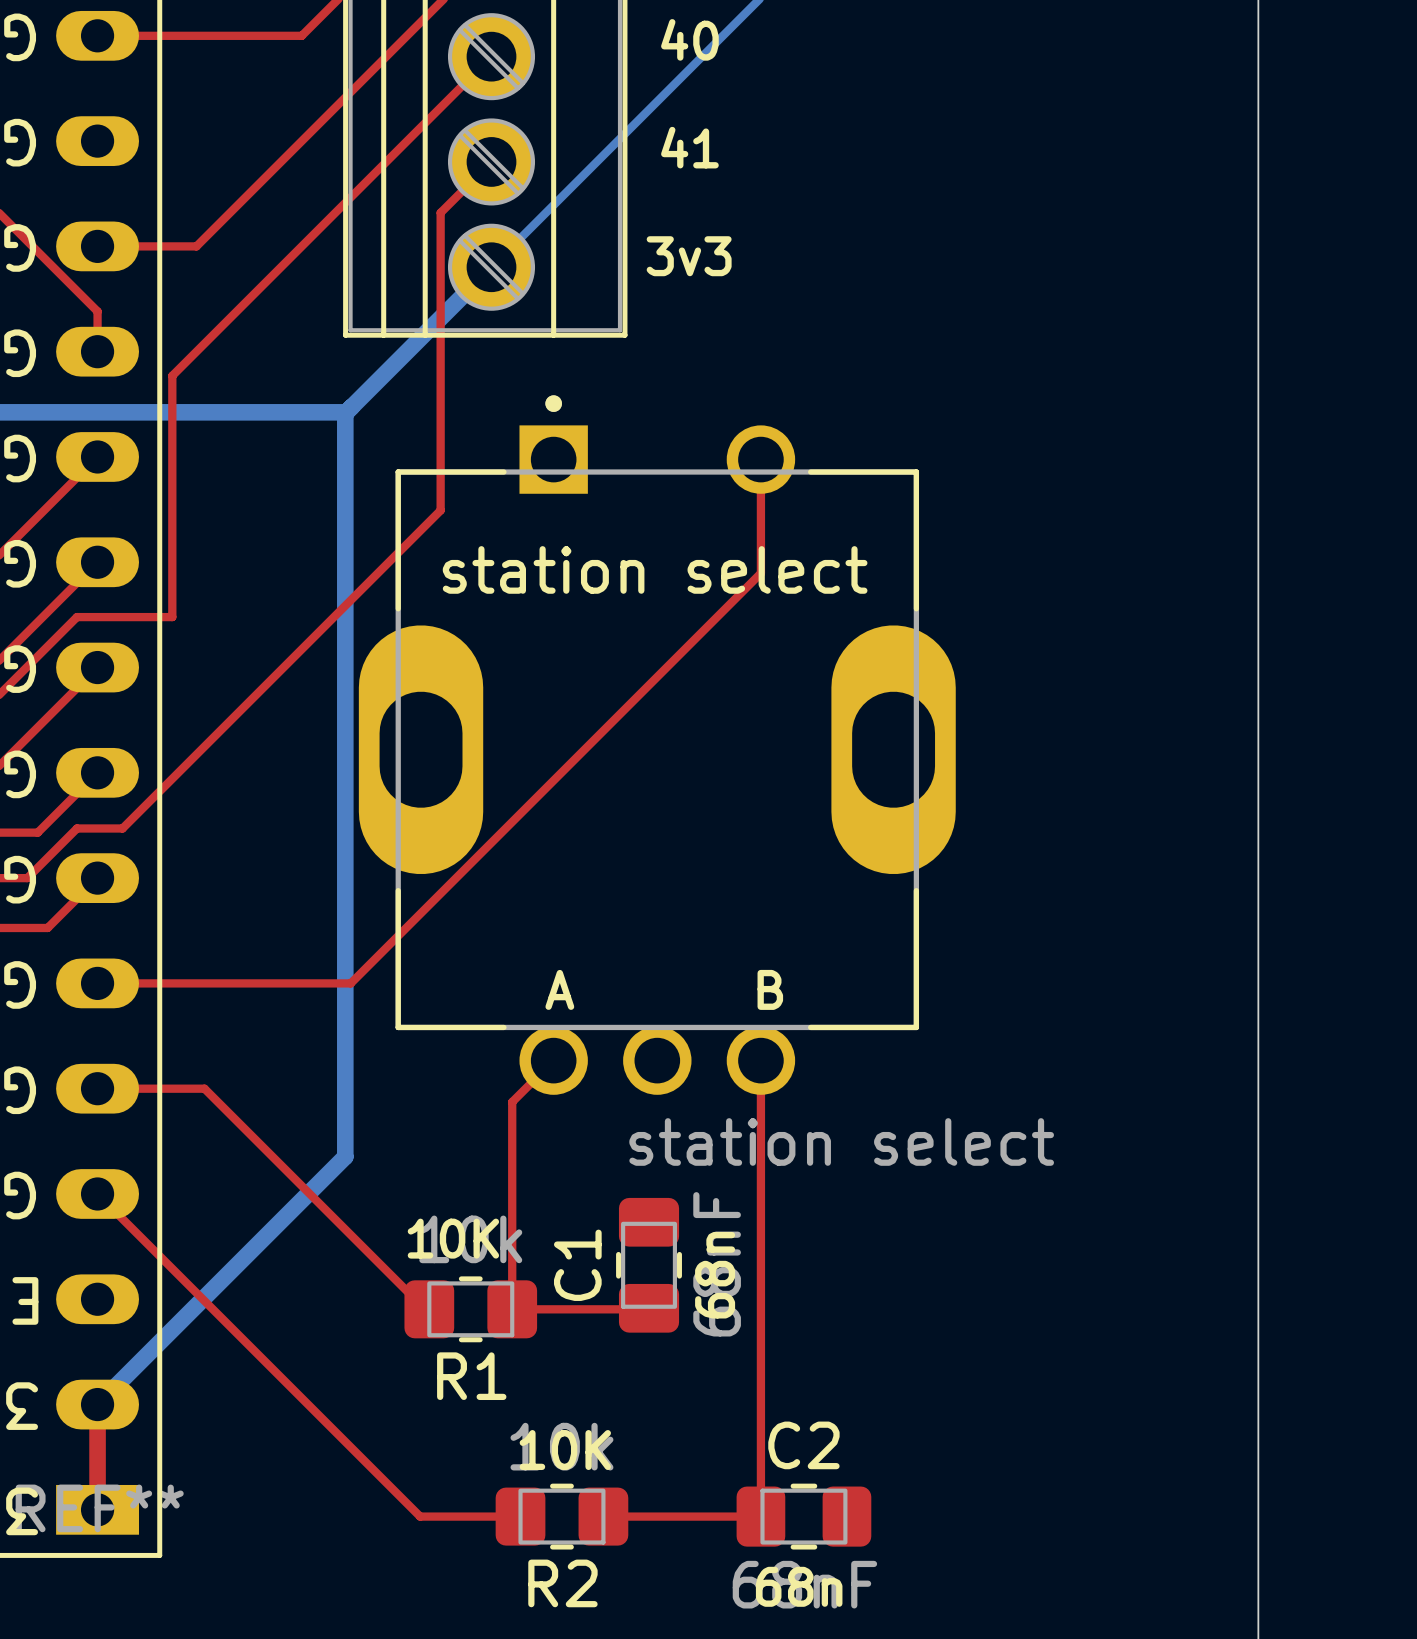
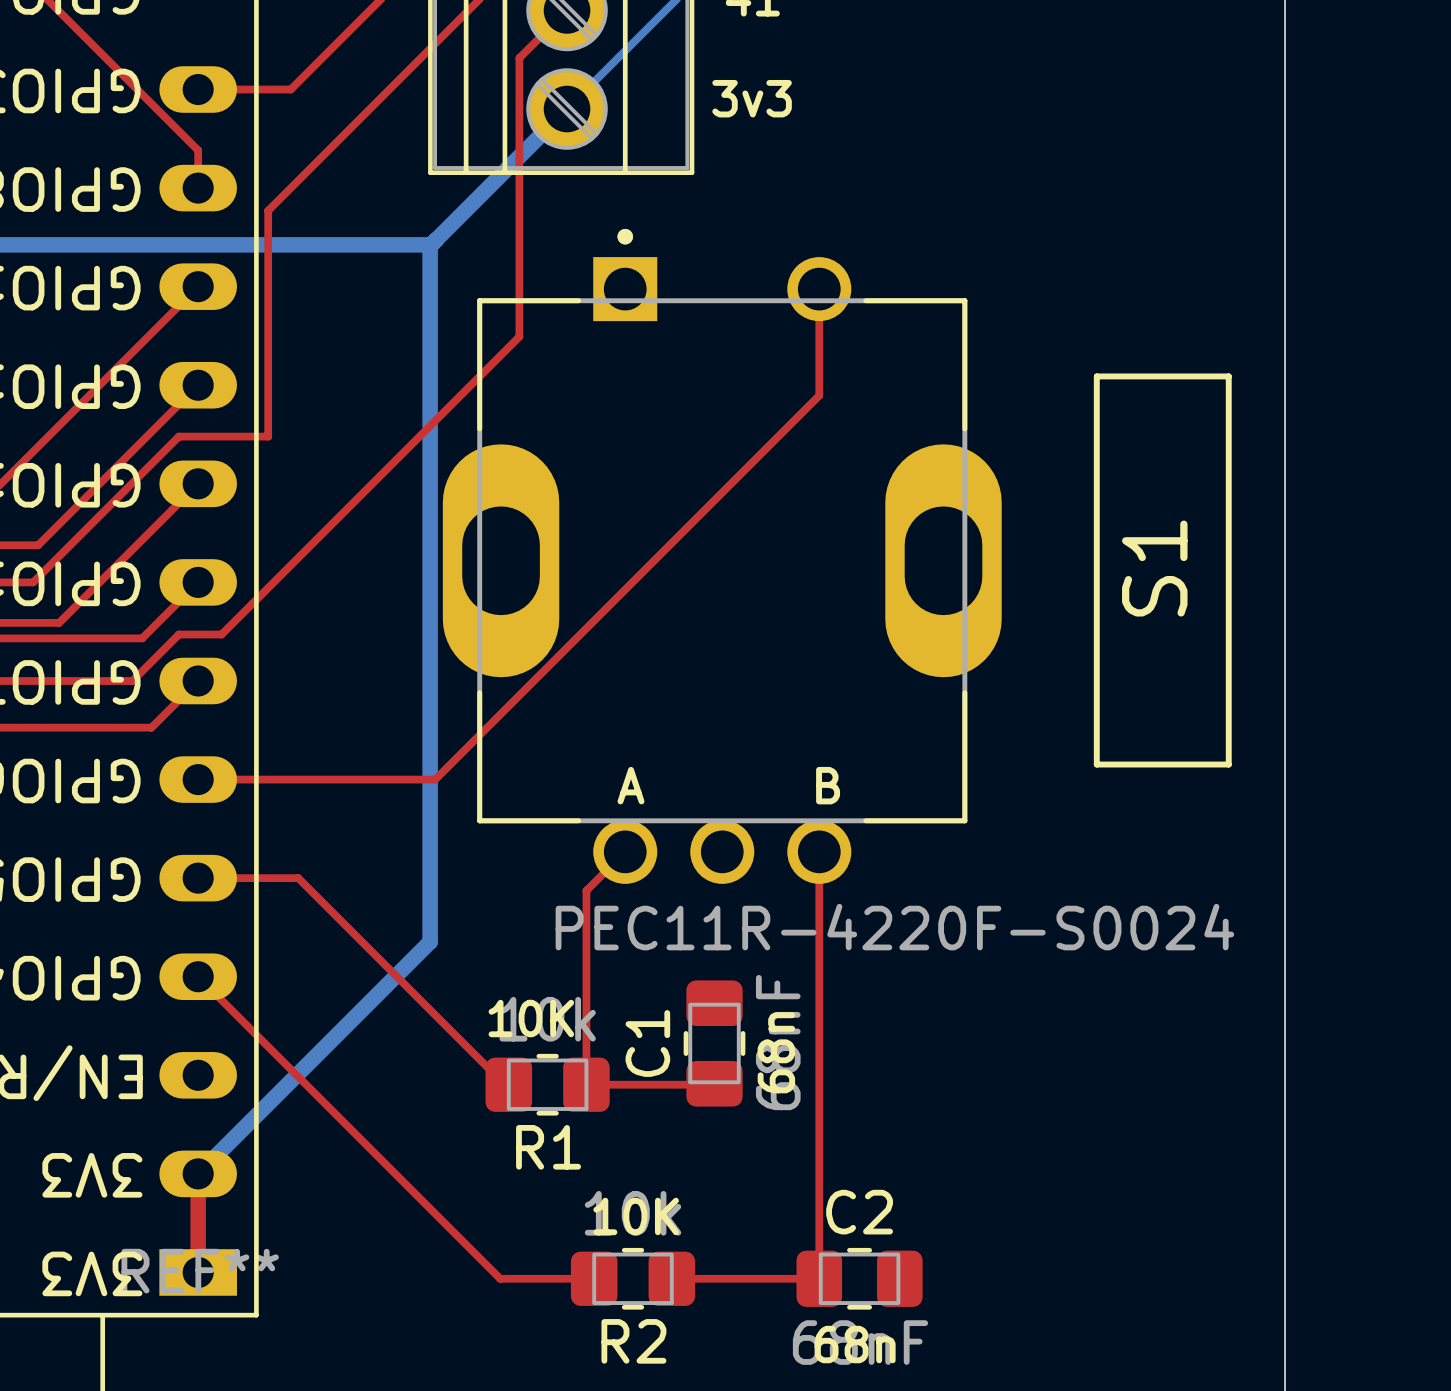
line: none -> (1096, 376) (1228, 376) (1228, 764) (1096, 764) (1096, 376)
station select name: station select (655, 569) -> S1 (1154, 568)
station select value: station select (841, 1141) -> PEC11R-4220F-S0024 (894, 927)

